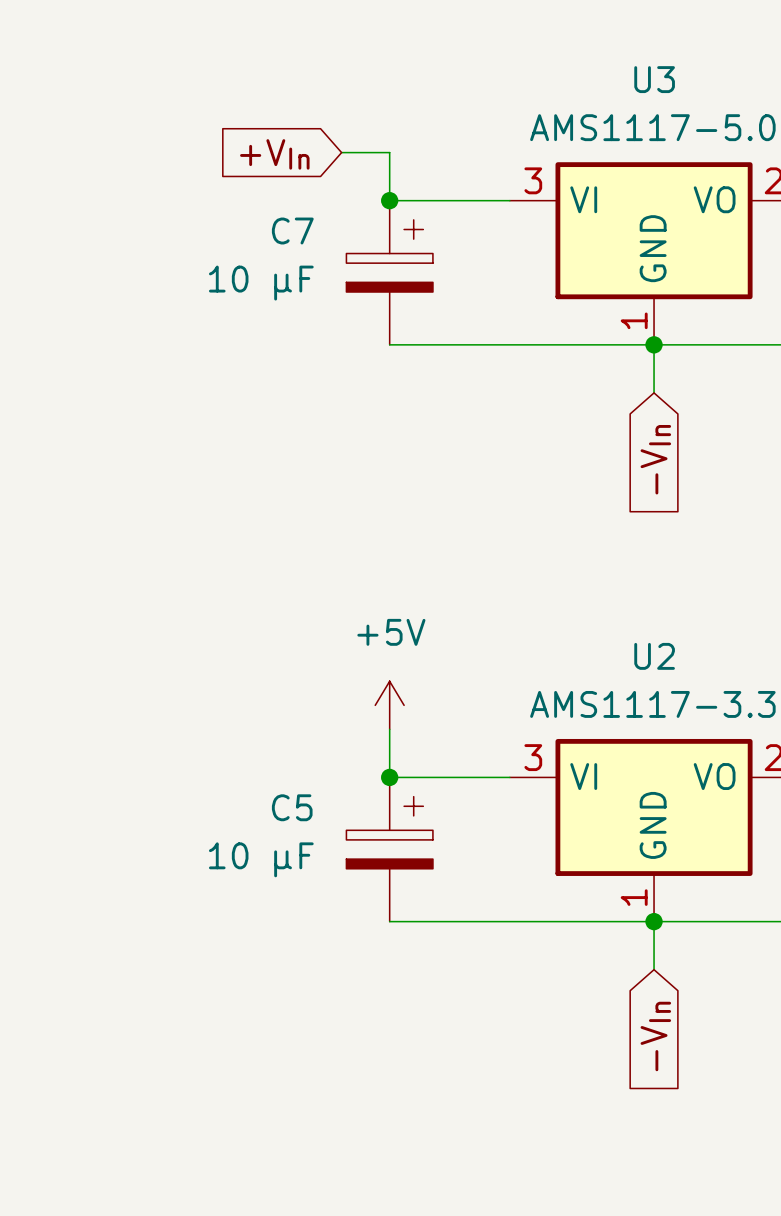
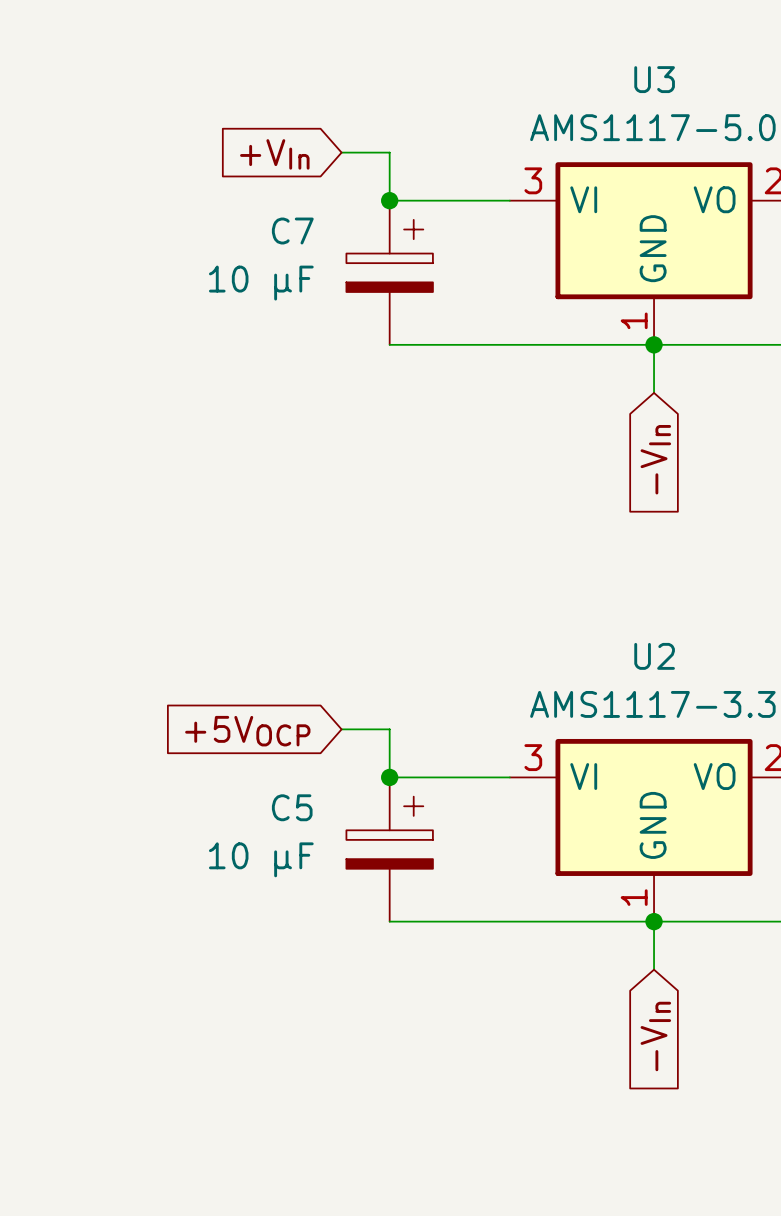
power symbol: +5V (389, 705) -> none
wire: none -> (341, 729) (389, 729)
global label: none -> +5VOCP (247, 731)

